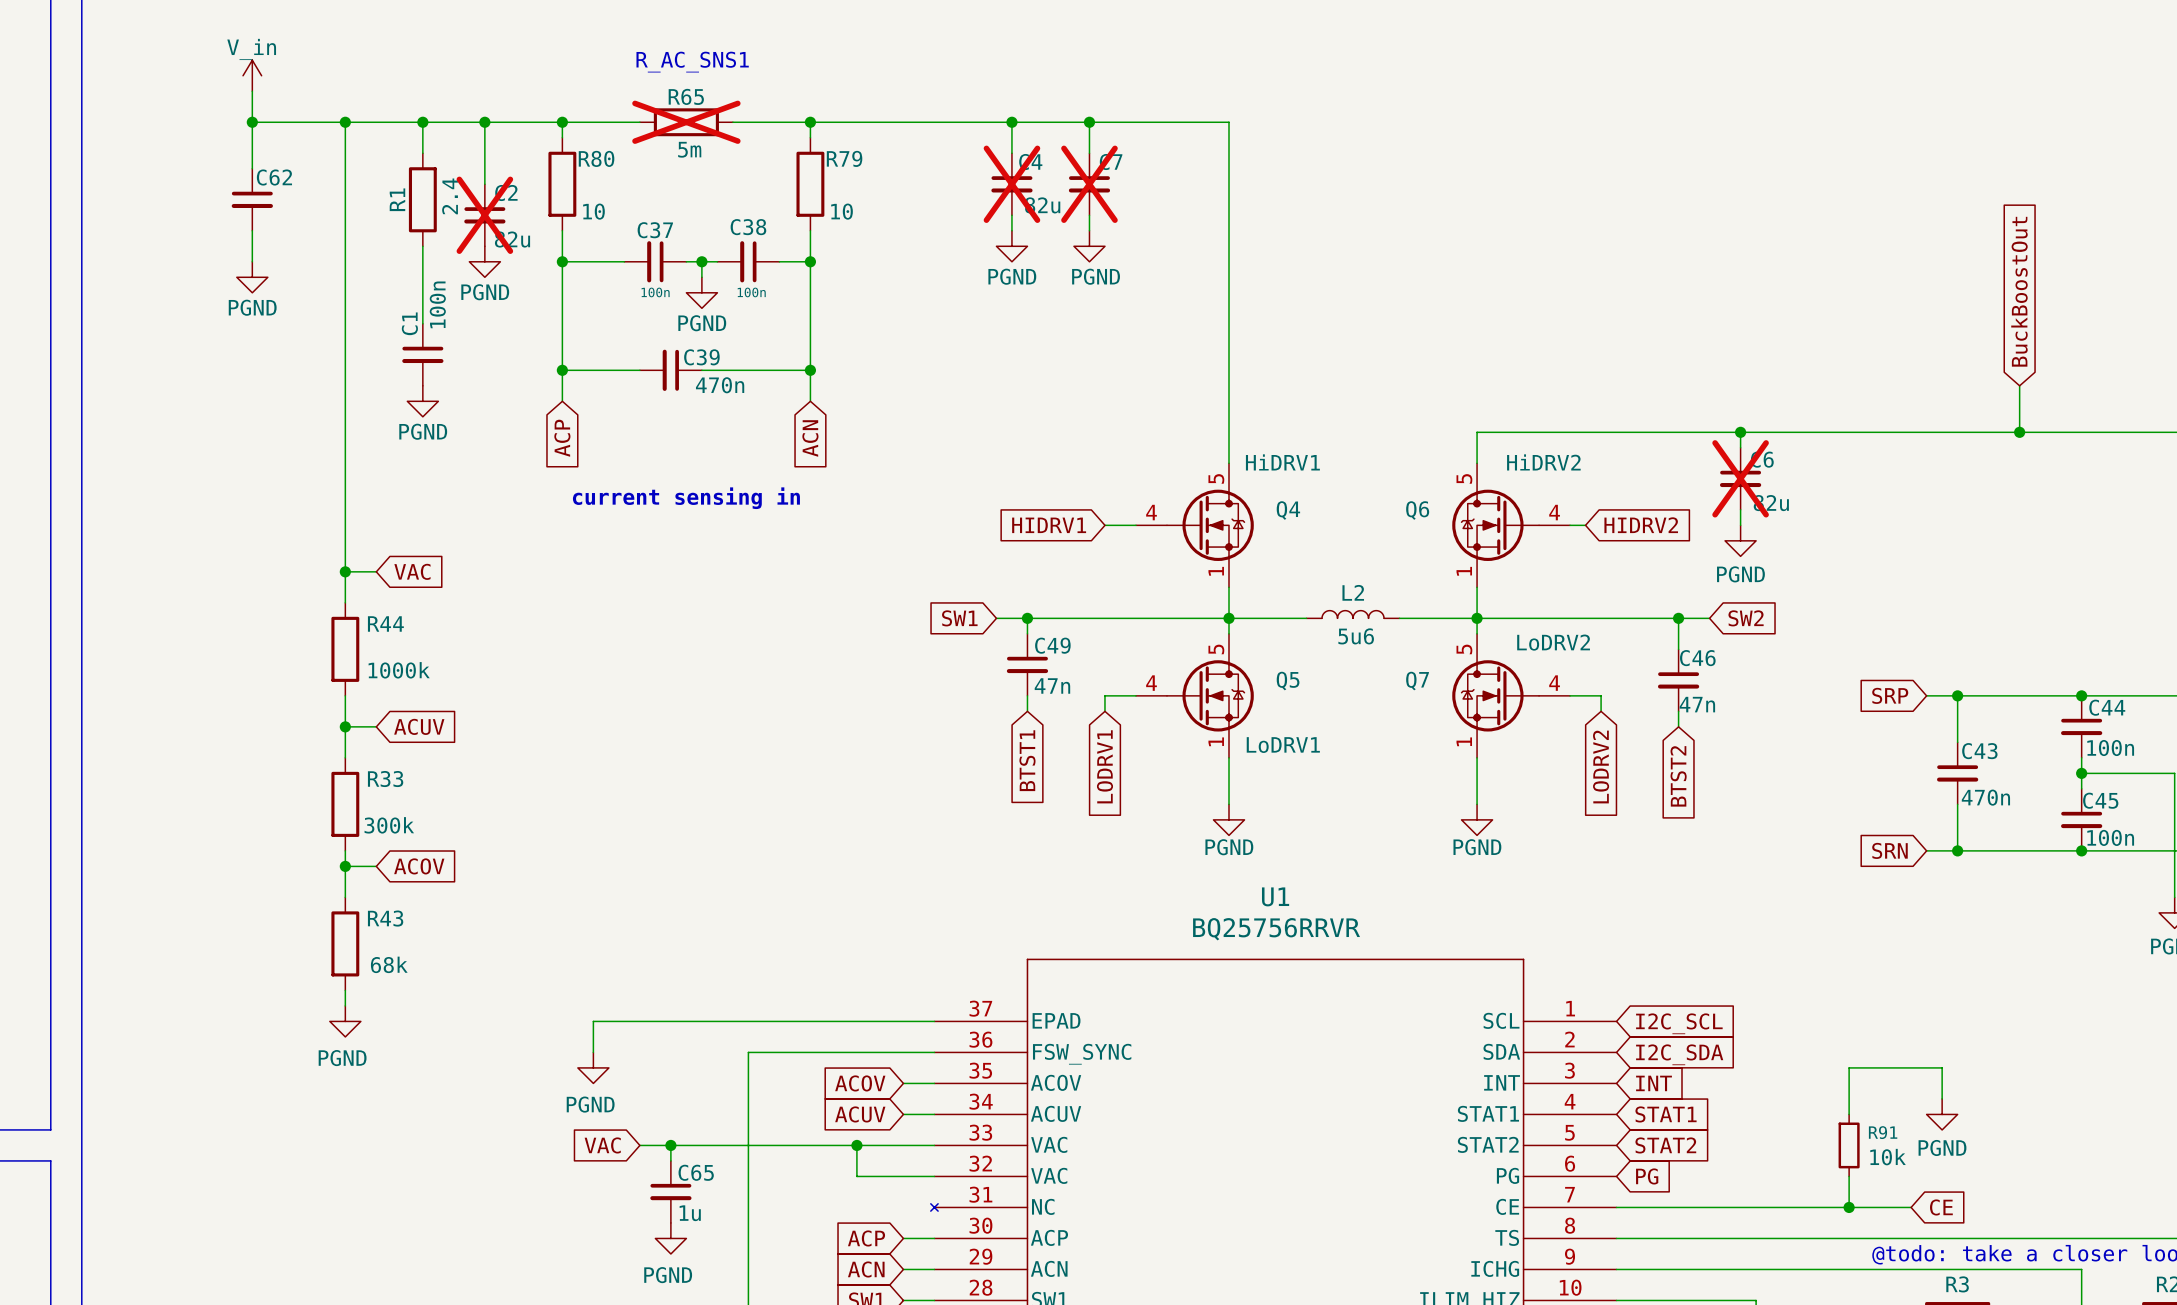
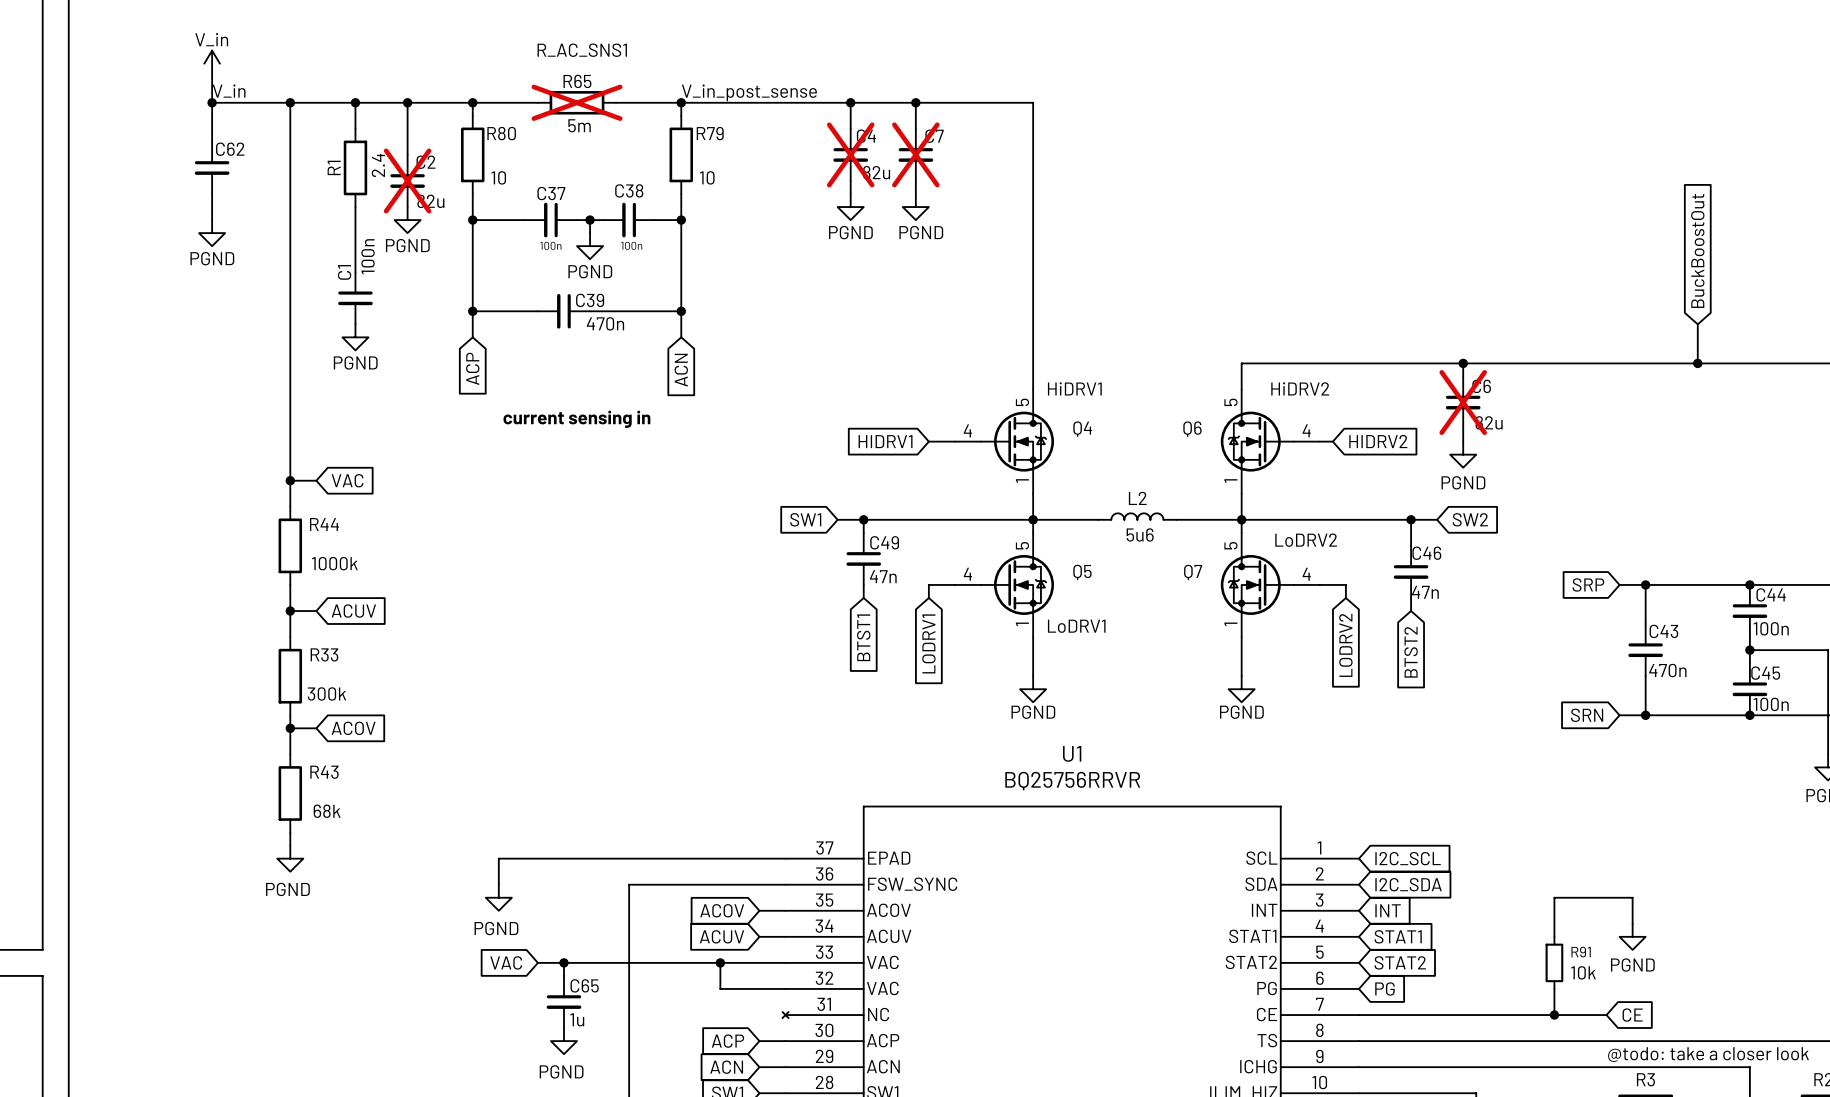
label: none -> V_in (229, 91)
label: none -> V_in_post_sense (749, 92)

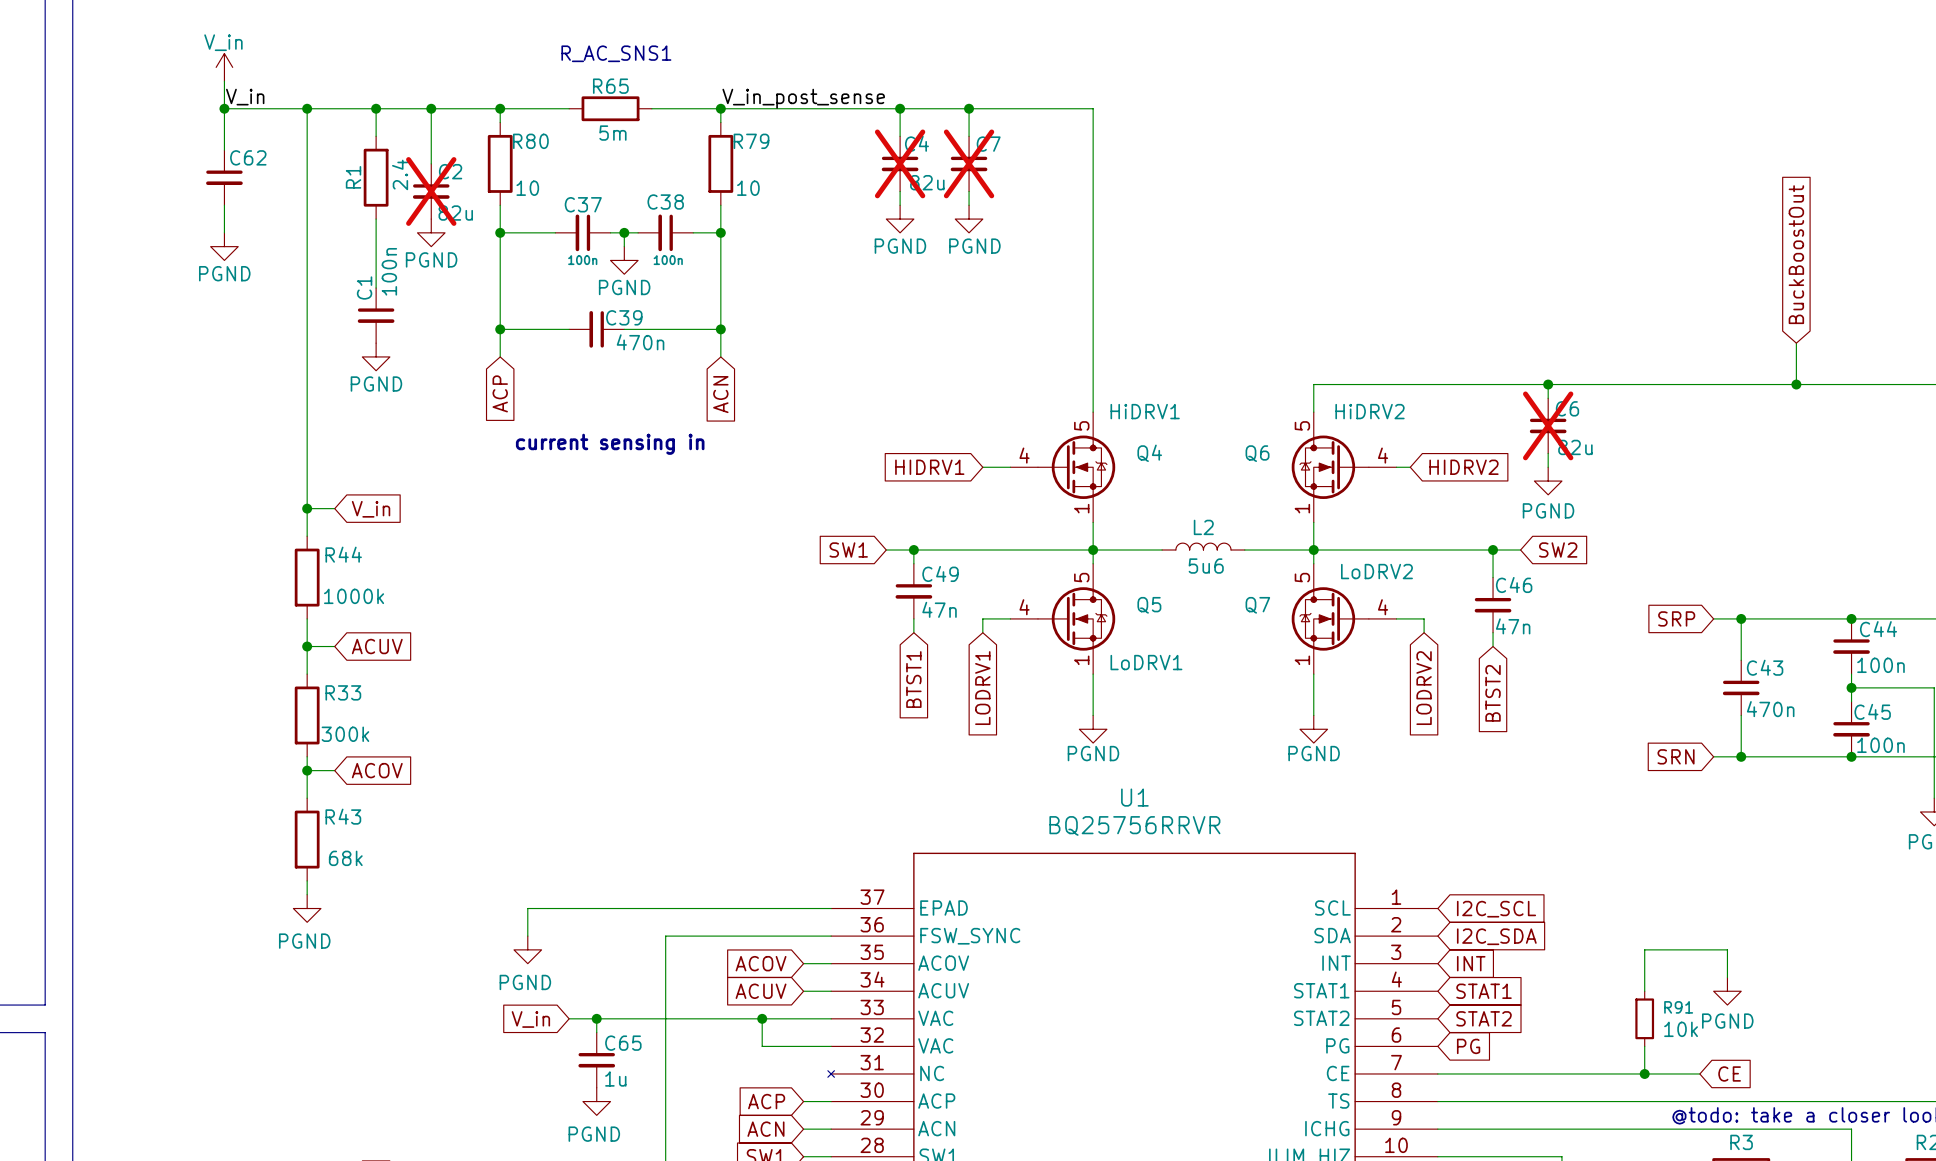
R65 do-not-place cross: (577, 102) -> none
global label: VAC (347, 480) -> V_in (371, 509)
global label: VAC (506, 962) -> V_in (530, 1019)

